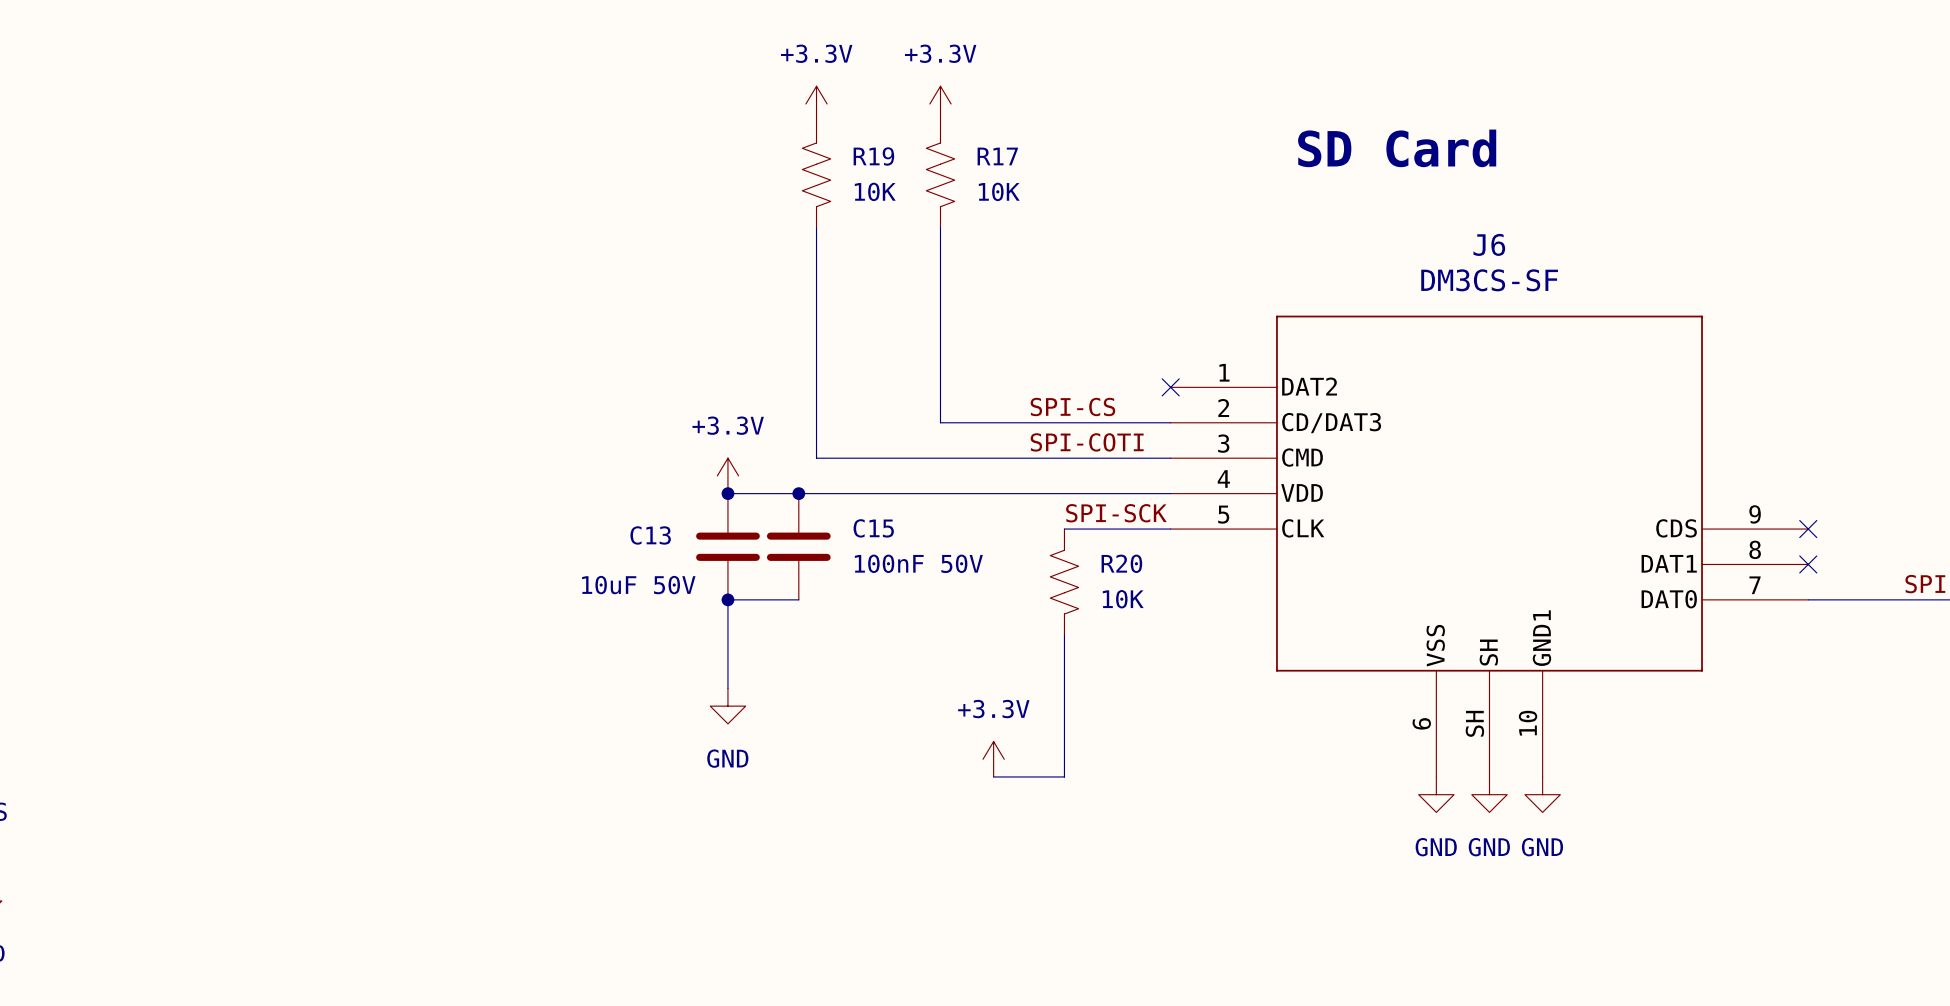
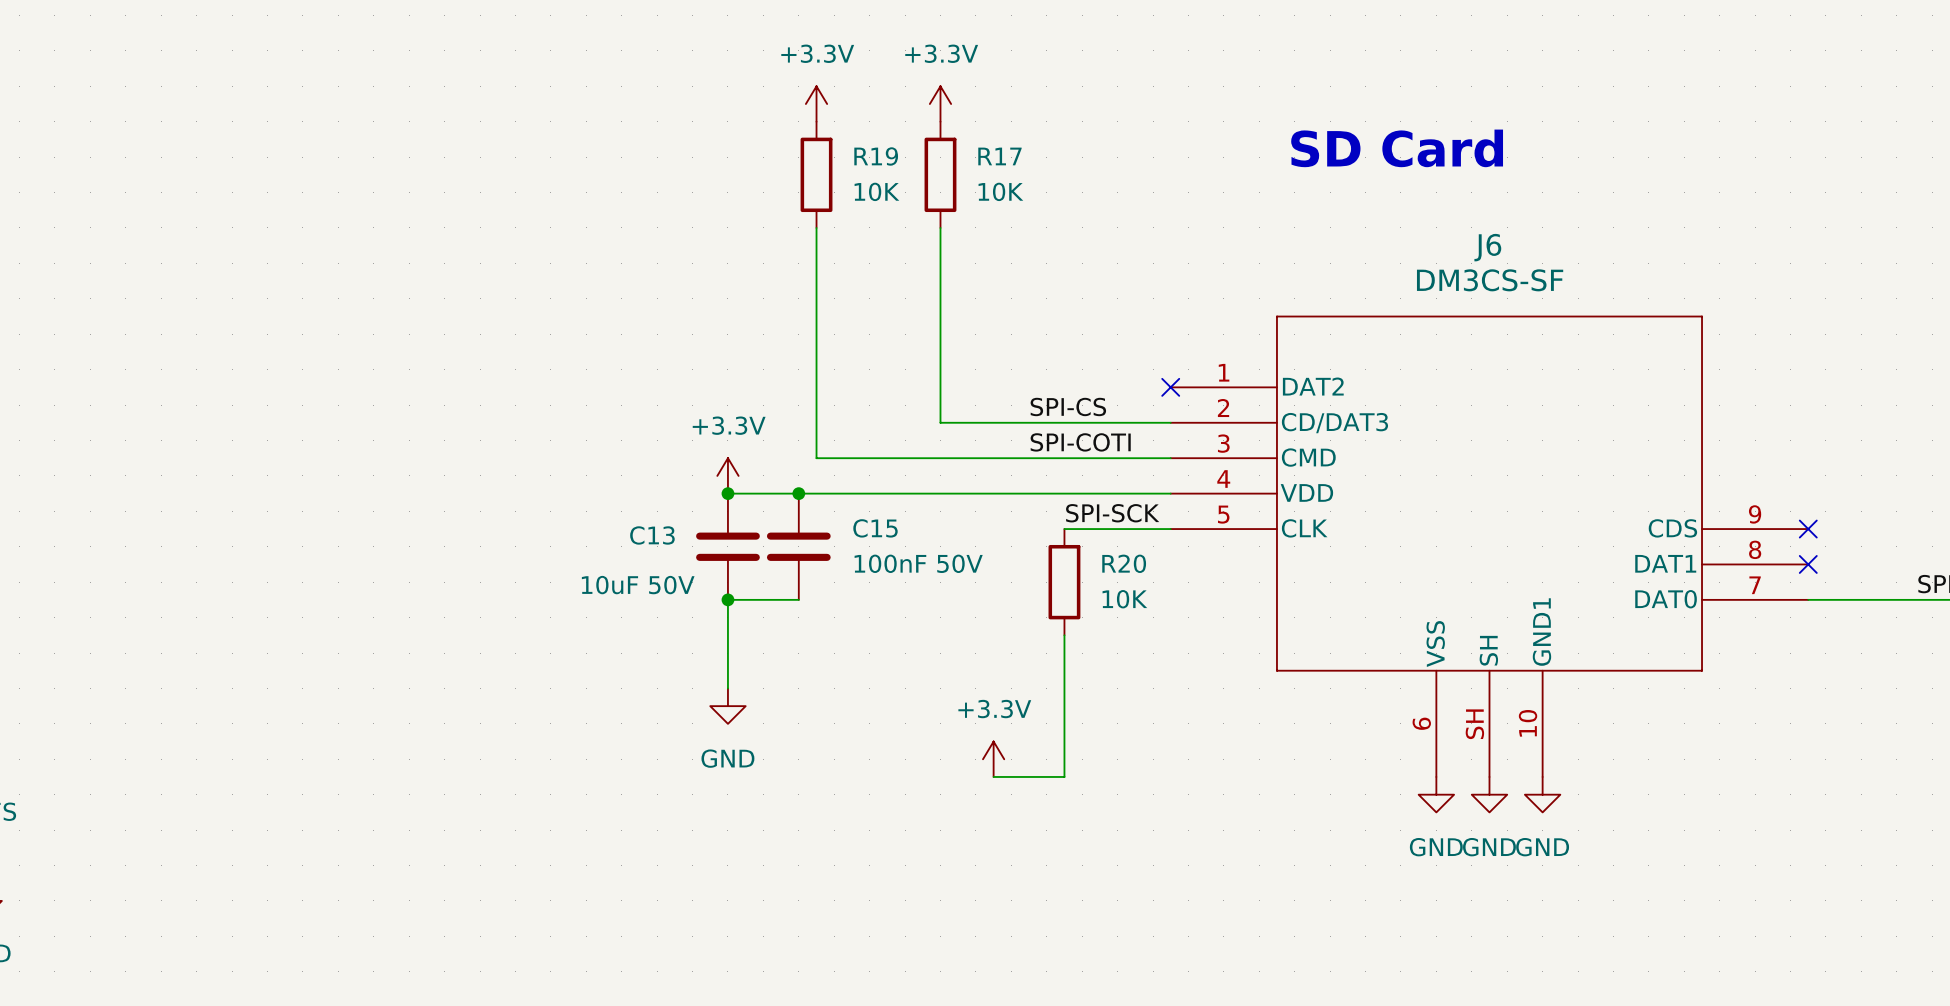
R19 symbol: [802, 121, 831, 228] -> [800, 121, 833, 228]
R17 symbol: [926, 121, 955, 228] -> [924, 121, 957, 228]
R20 symbol: [1050, 529, 1079, 636] -> [1048, 529, 1081, 636]

